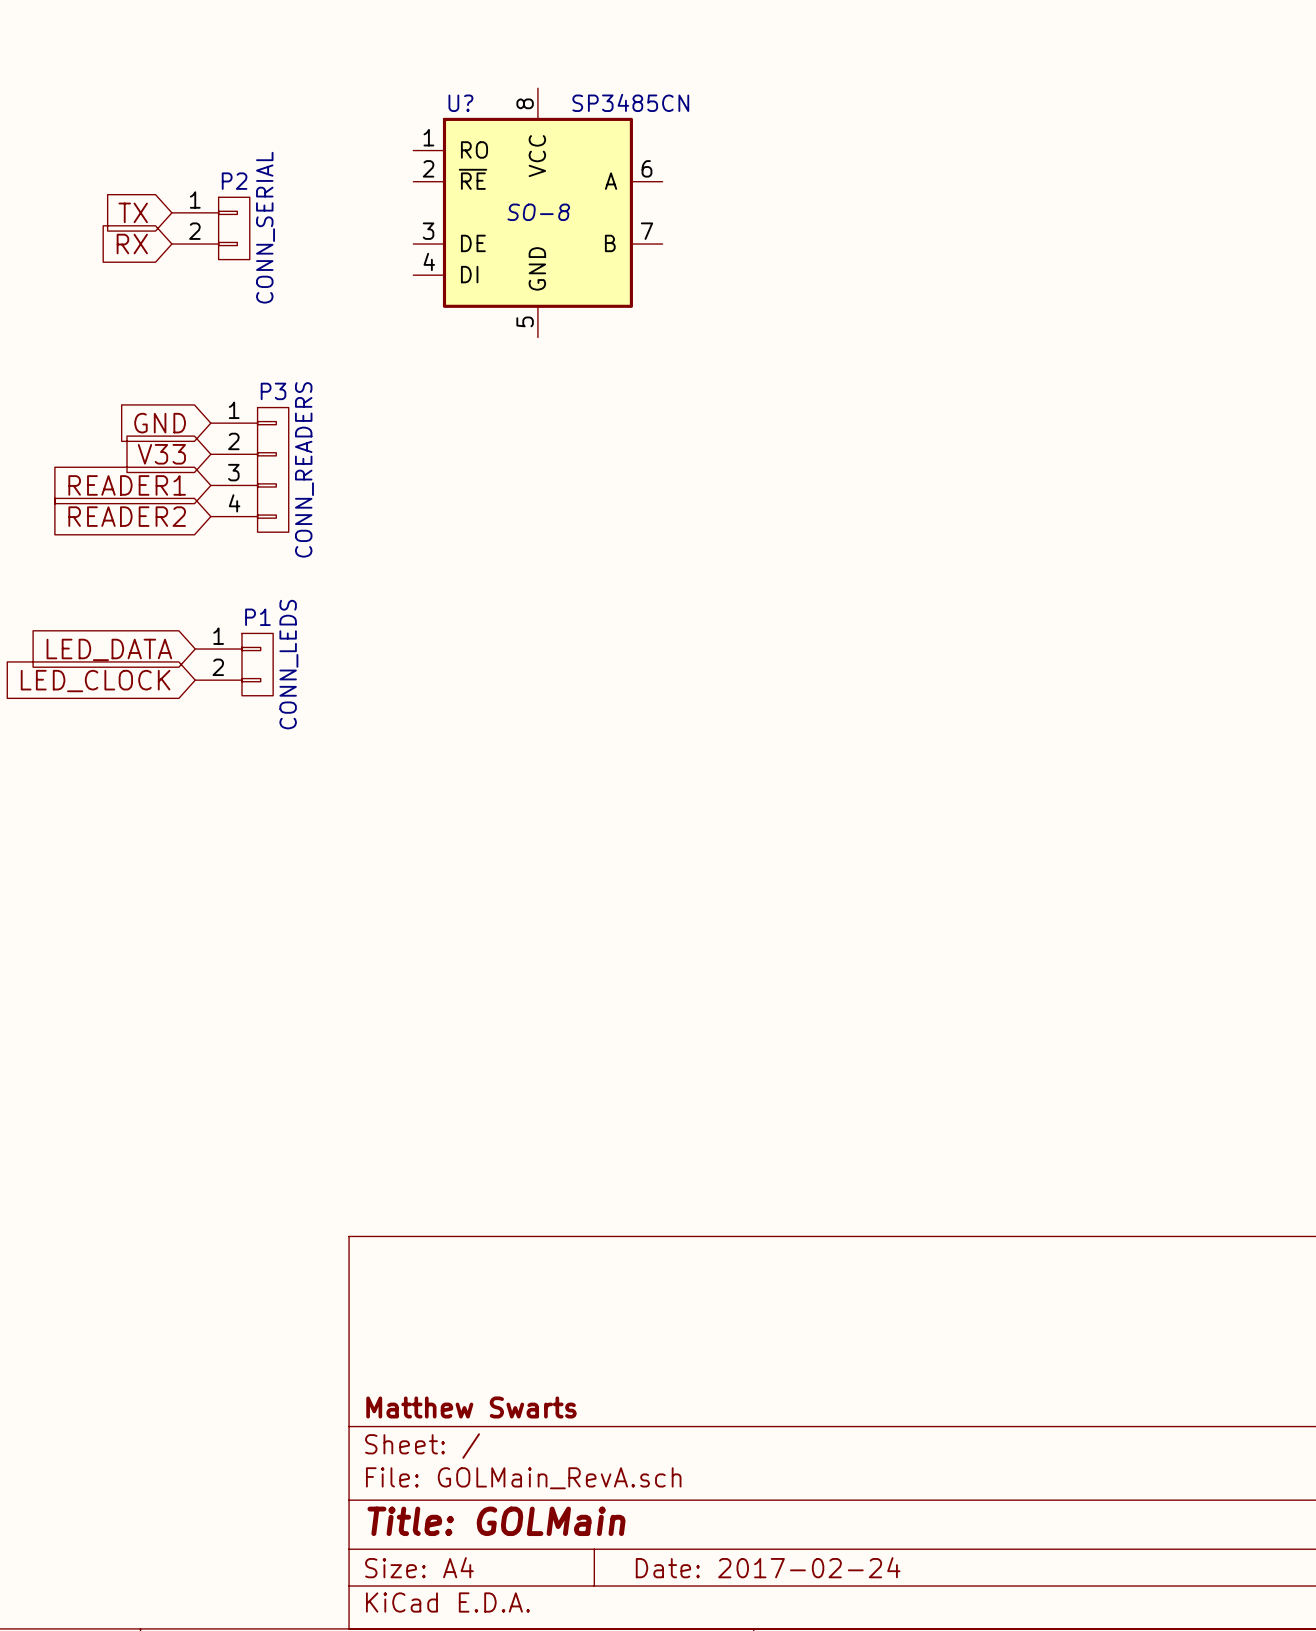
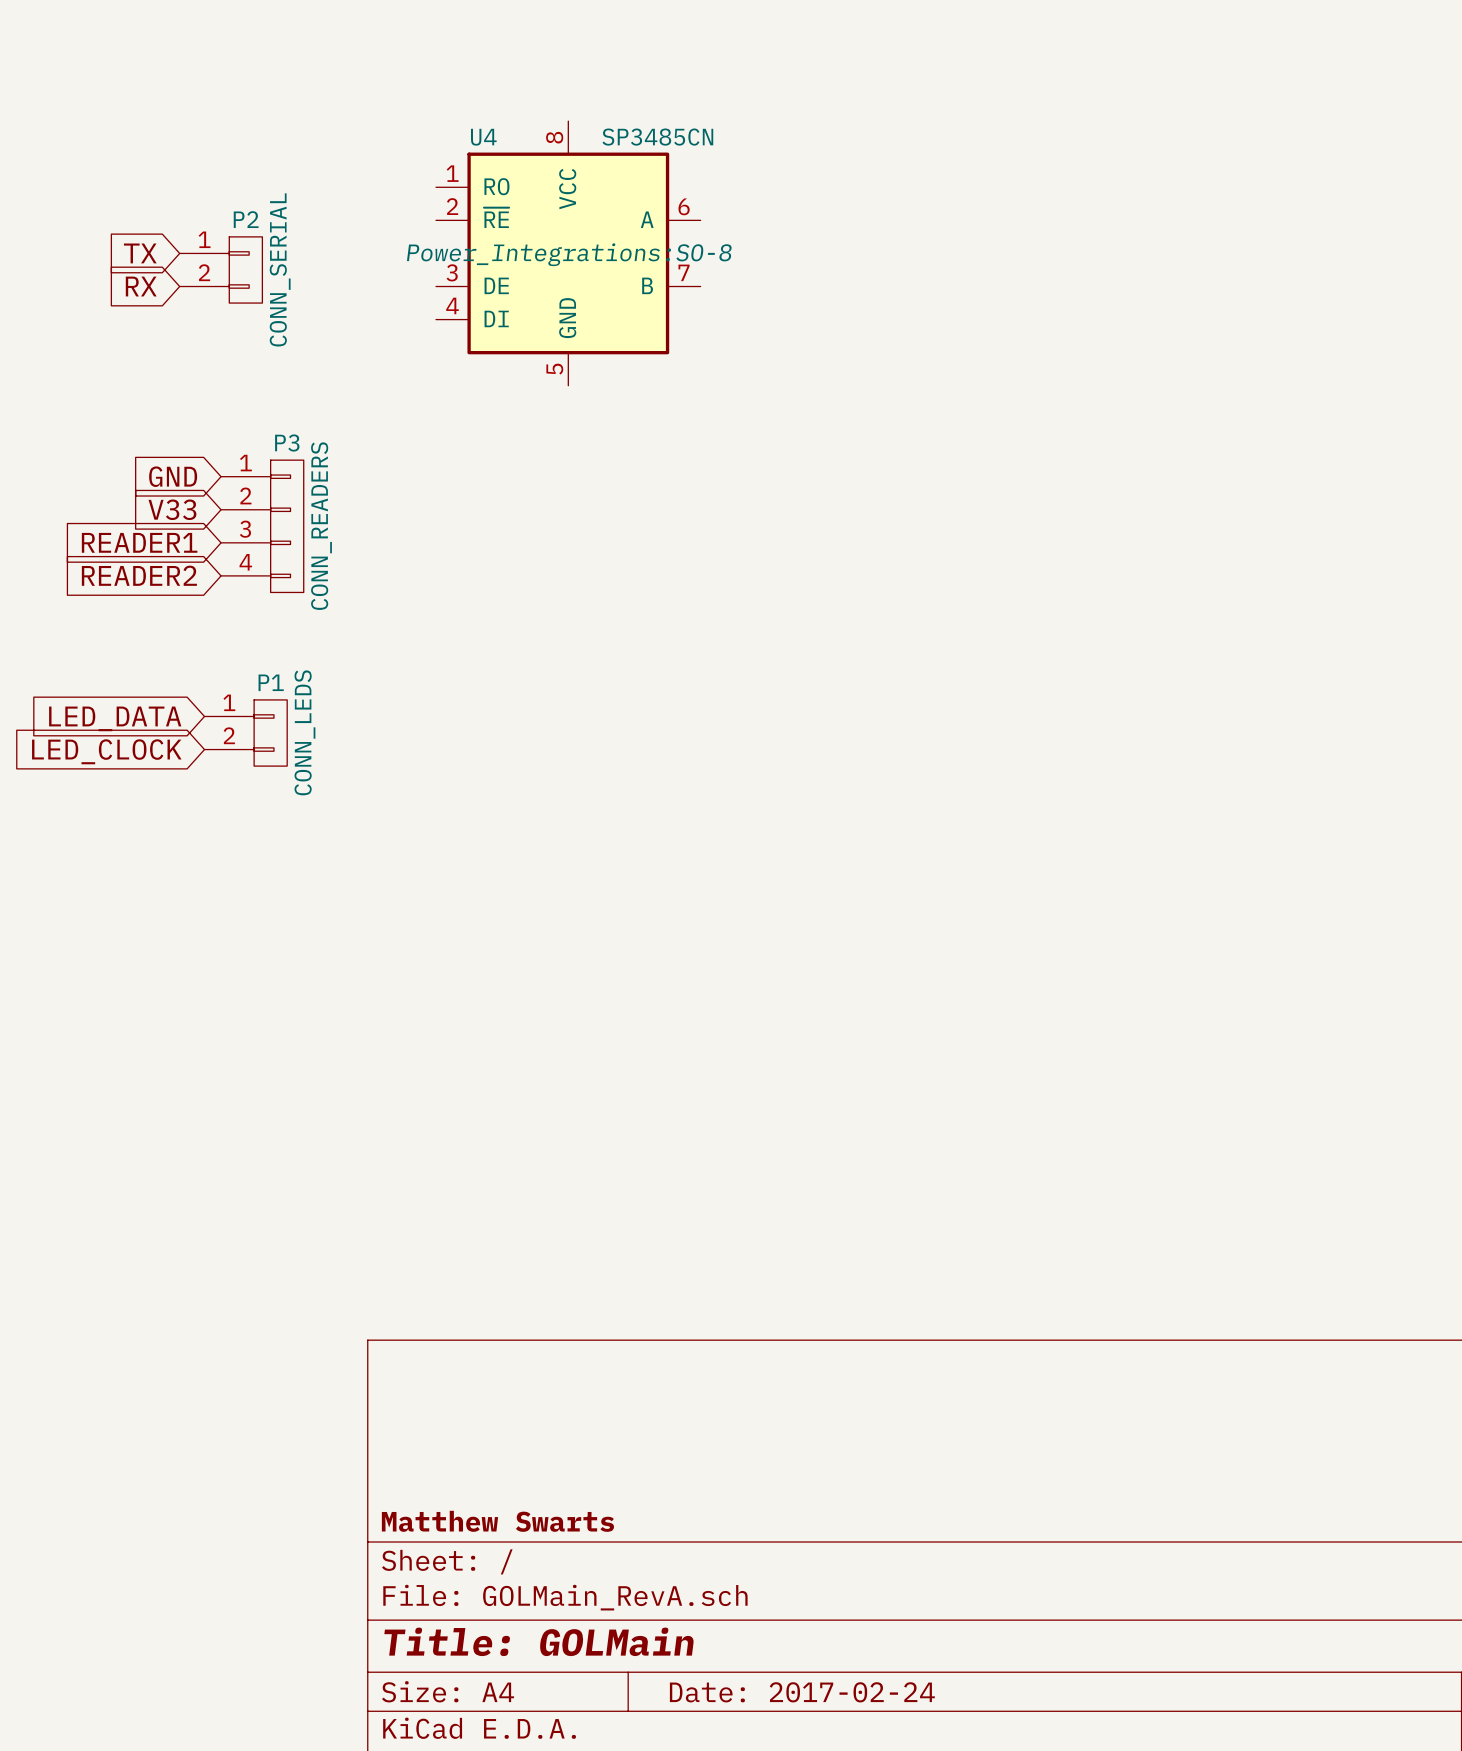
U? name: U? (460, 103) -> U4 (483, 137)
U? text: SO-8 (538, 212) -> Power_Integrations:SO-8 (569, 254)

